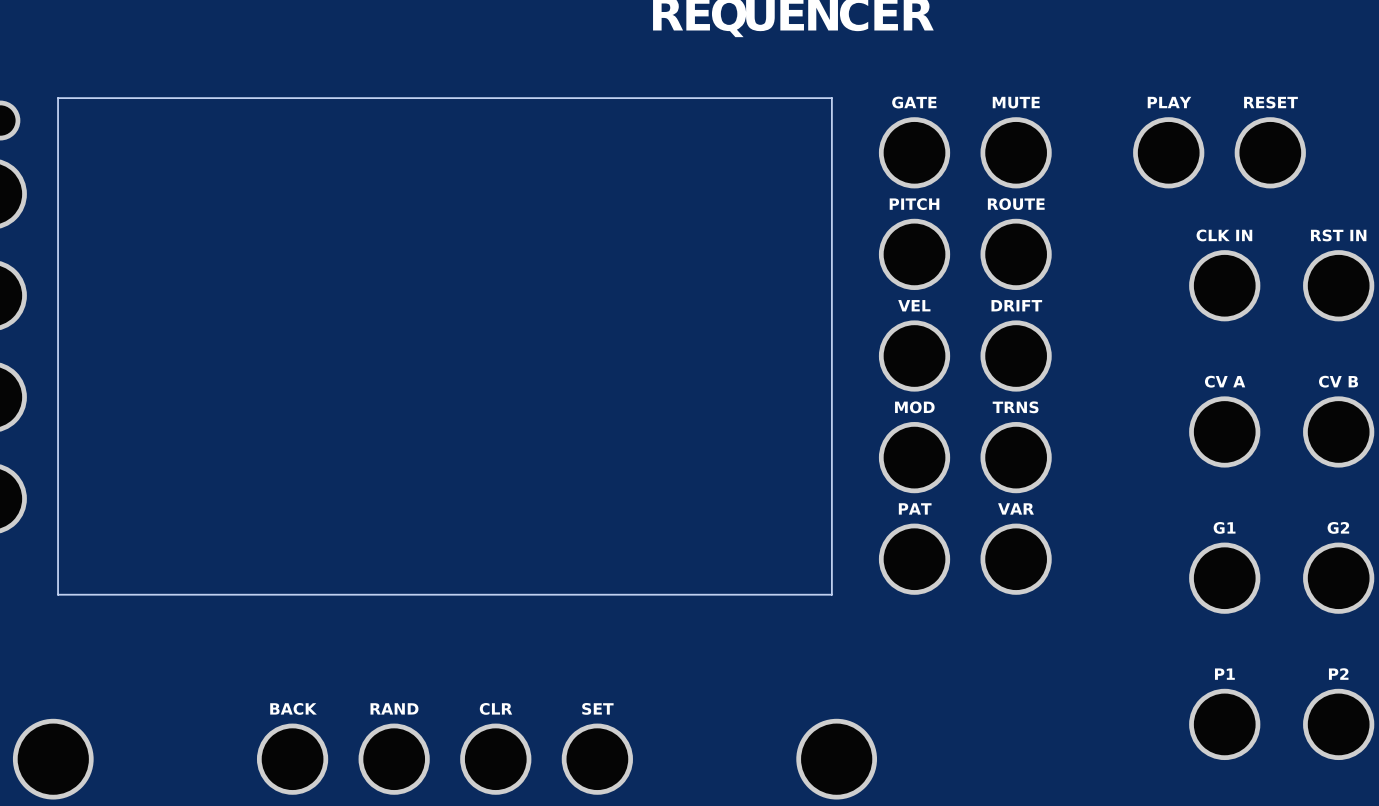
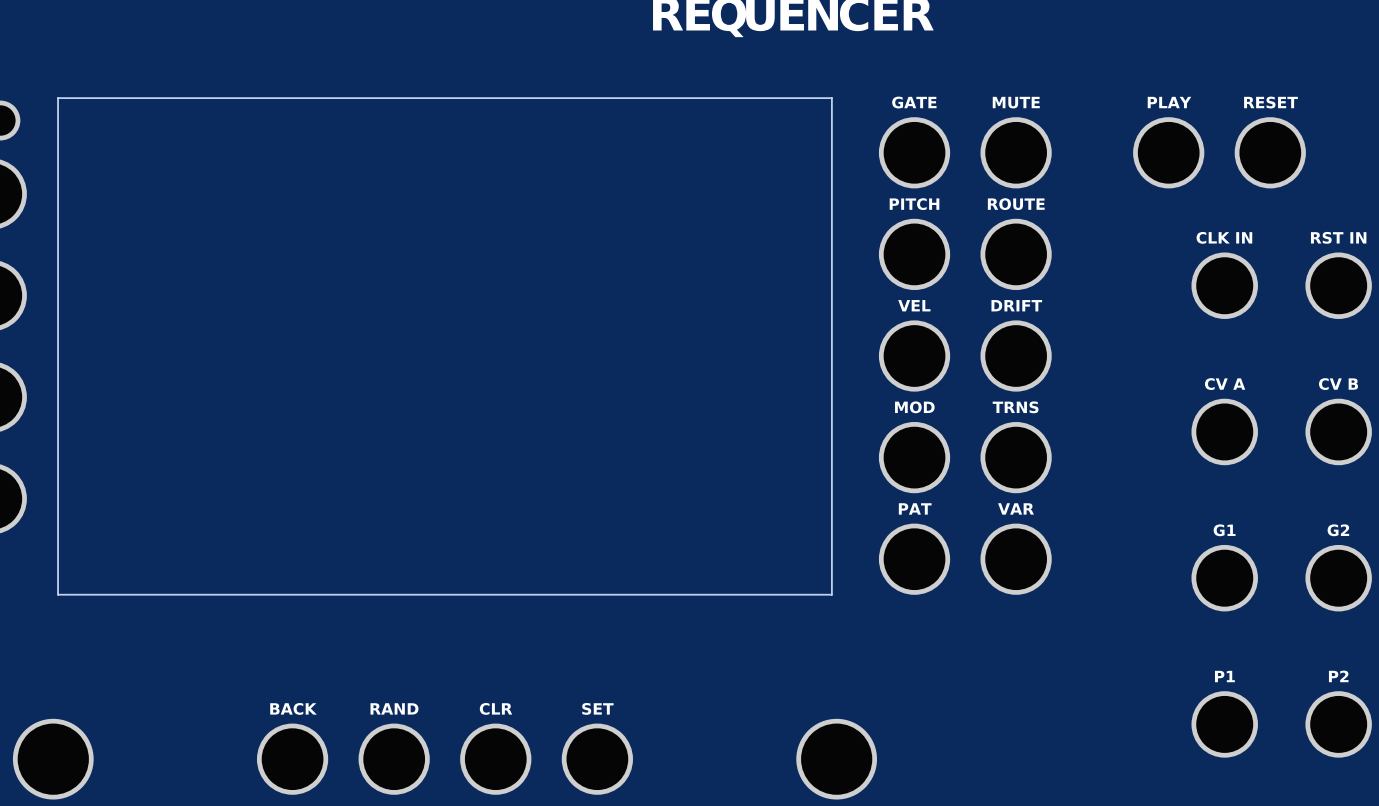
part footprint: [1189, 250, 1261, 322] -> [1191, 252, 1258, 319]
part footprint: [1303, 250, 1375, 322] -> [1305, 252, 1372, 319]
part footprint: [1189, 396, 1261, 468] -> [1191, 398, 1258, 466]
part footprint: [1303, 396, 1375, 468] -> [1305, 398, 1372, 466]
part footprint: [1189, 542, 1261, 614] -> [1191, 544, 1258, 612]
part footprint: [1303, 542, 1375, 614] -> [1305, 544, 1372, 612]
part footprint: [1189, 688, 1261, 761] -> [1191, 691, 1258, 758]
part footprint: [1303, 688, 1375, 761] -> [1305, 691, 1372, 758]

